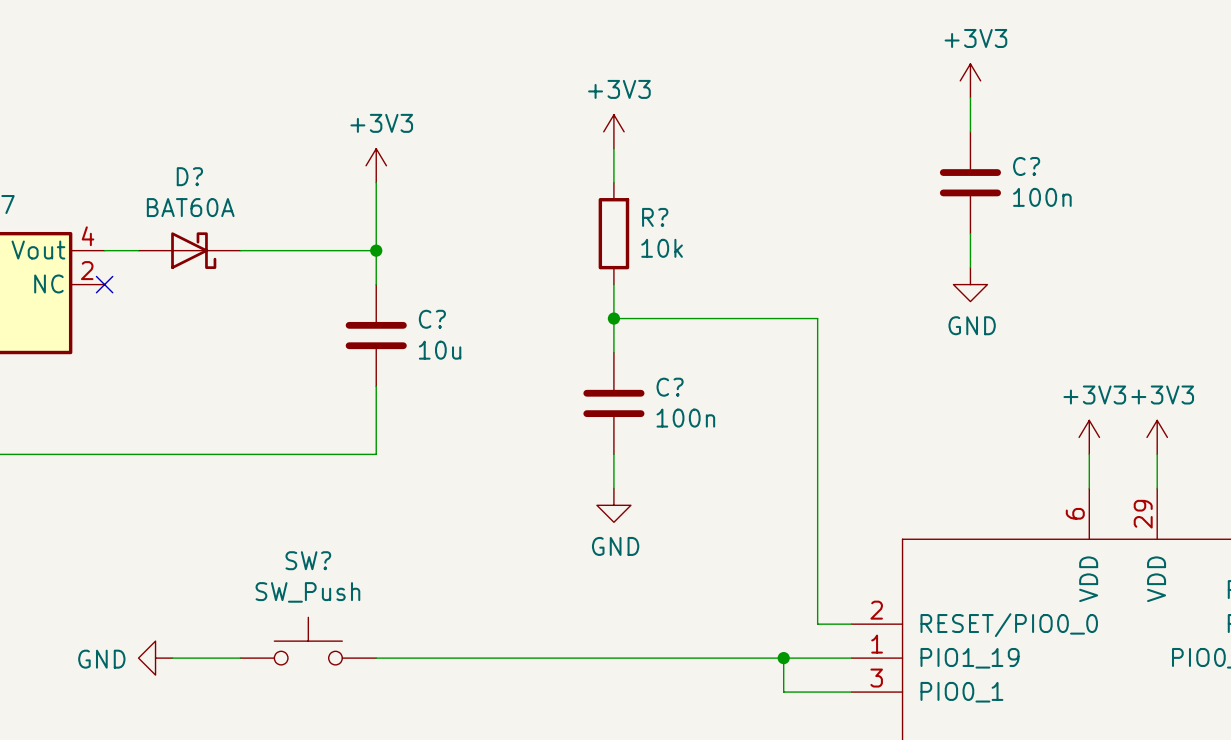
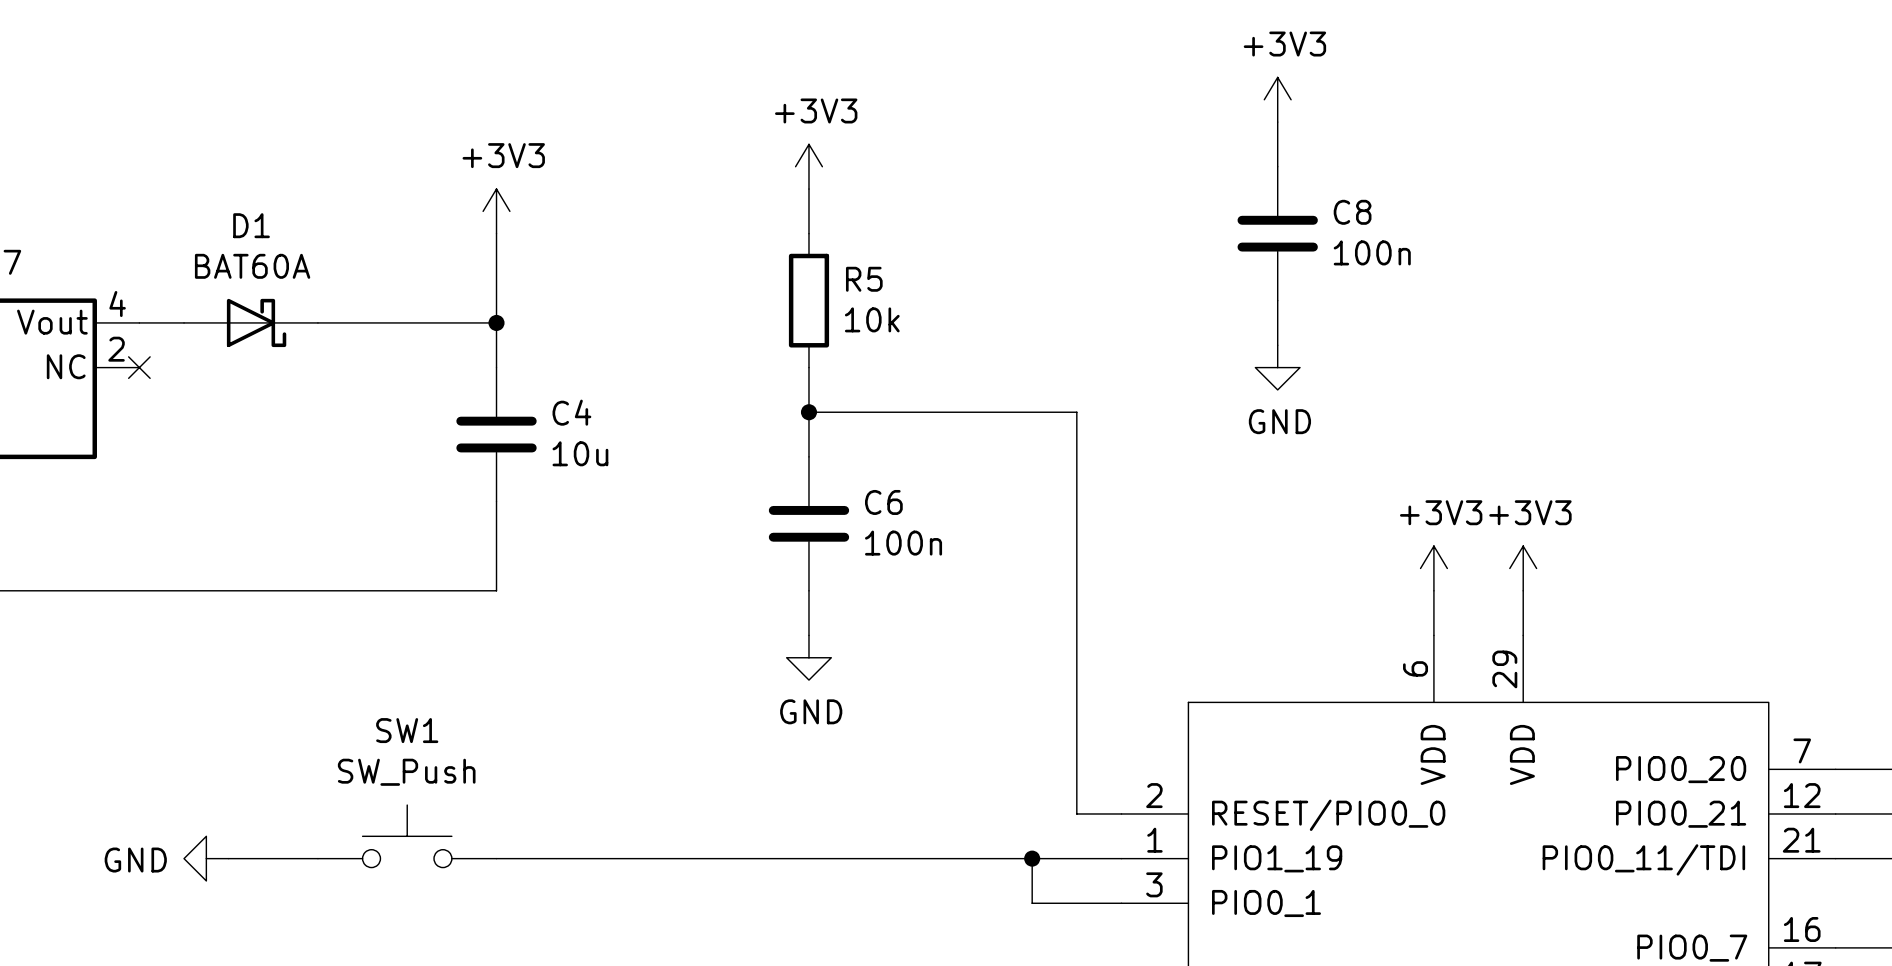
C? name: C? (1026, 166) -> C8 (1352, 212)
D? name: D? (189, 176) -> D1 (251, 225)
R? name: R? (655, 217) -> R5 (864, 279)
C? name: C? (432, 319) -> C4 (571, 412)
C? name: C? (670, 387) -> C6 (883, 502)
SW? name: SW? (308, 560) -> SW1 (407, 730)

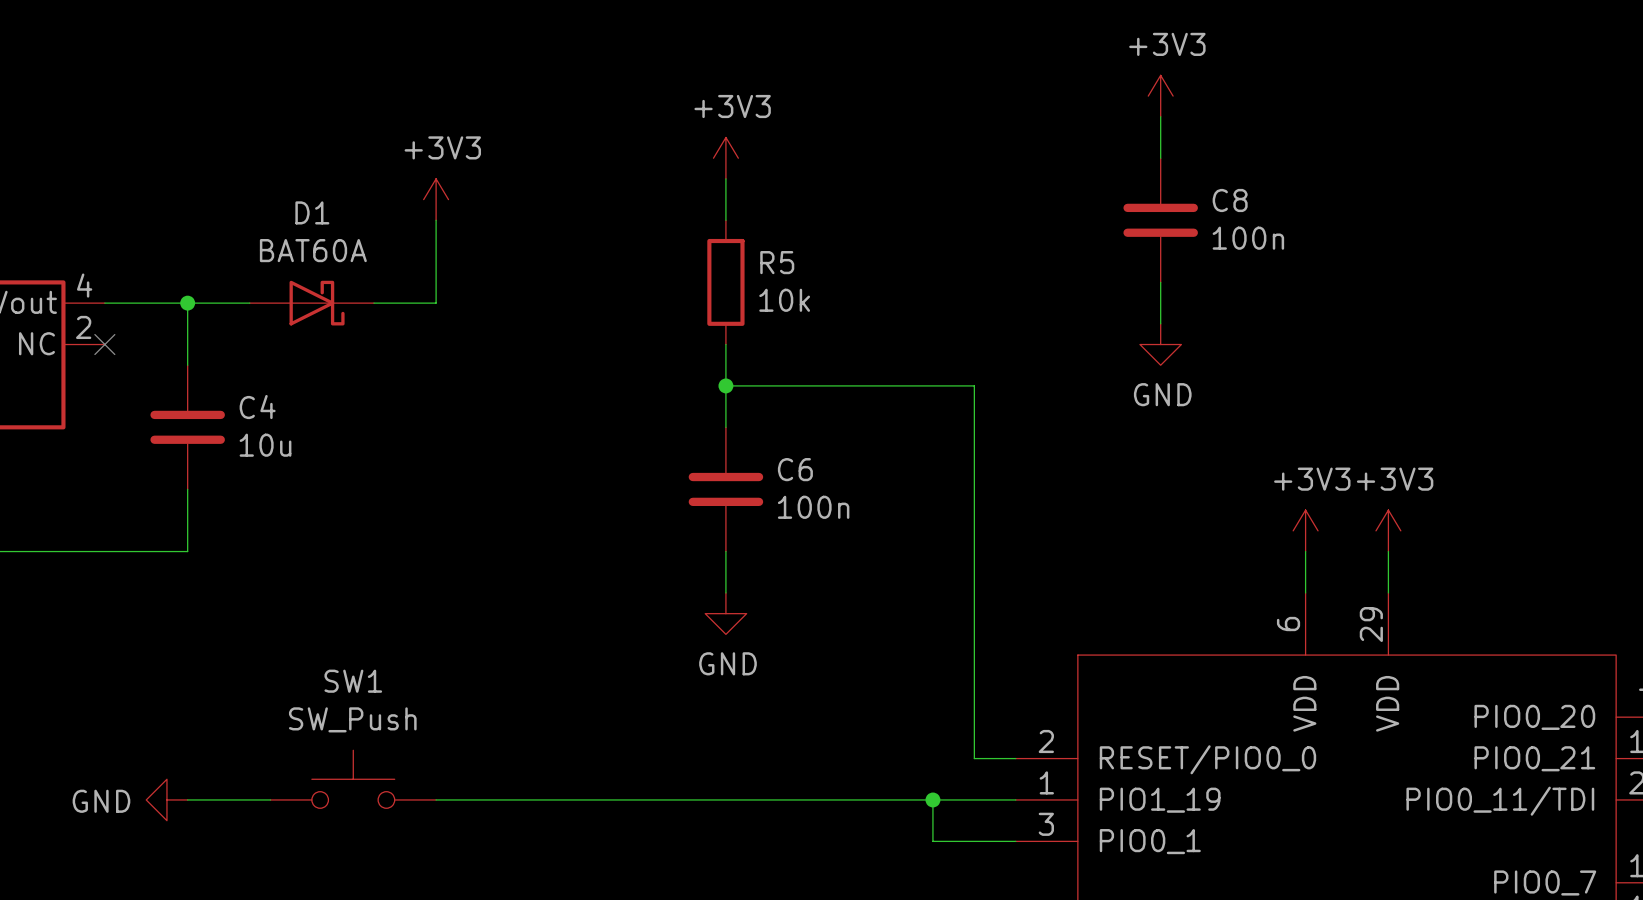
wire: none -> (187, 303) (187, 365)
junction: none -> (187, 303)
D1 position: (250, 322) -> (311, 303)
wire: (496, 322) (496, 367) -> none
junction: (496, 322) -> none
C4 position: (496, 434) -> (187, 427)
wire: (496, 501) (496, 590) (228, 590) -> (187, 489) (187, 551)

